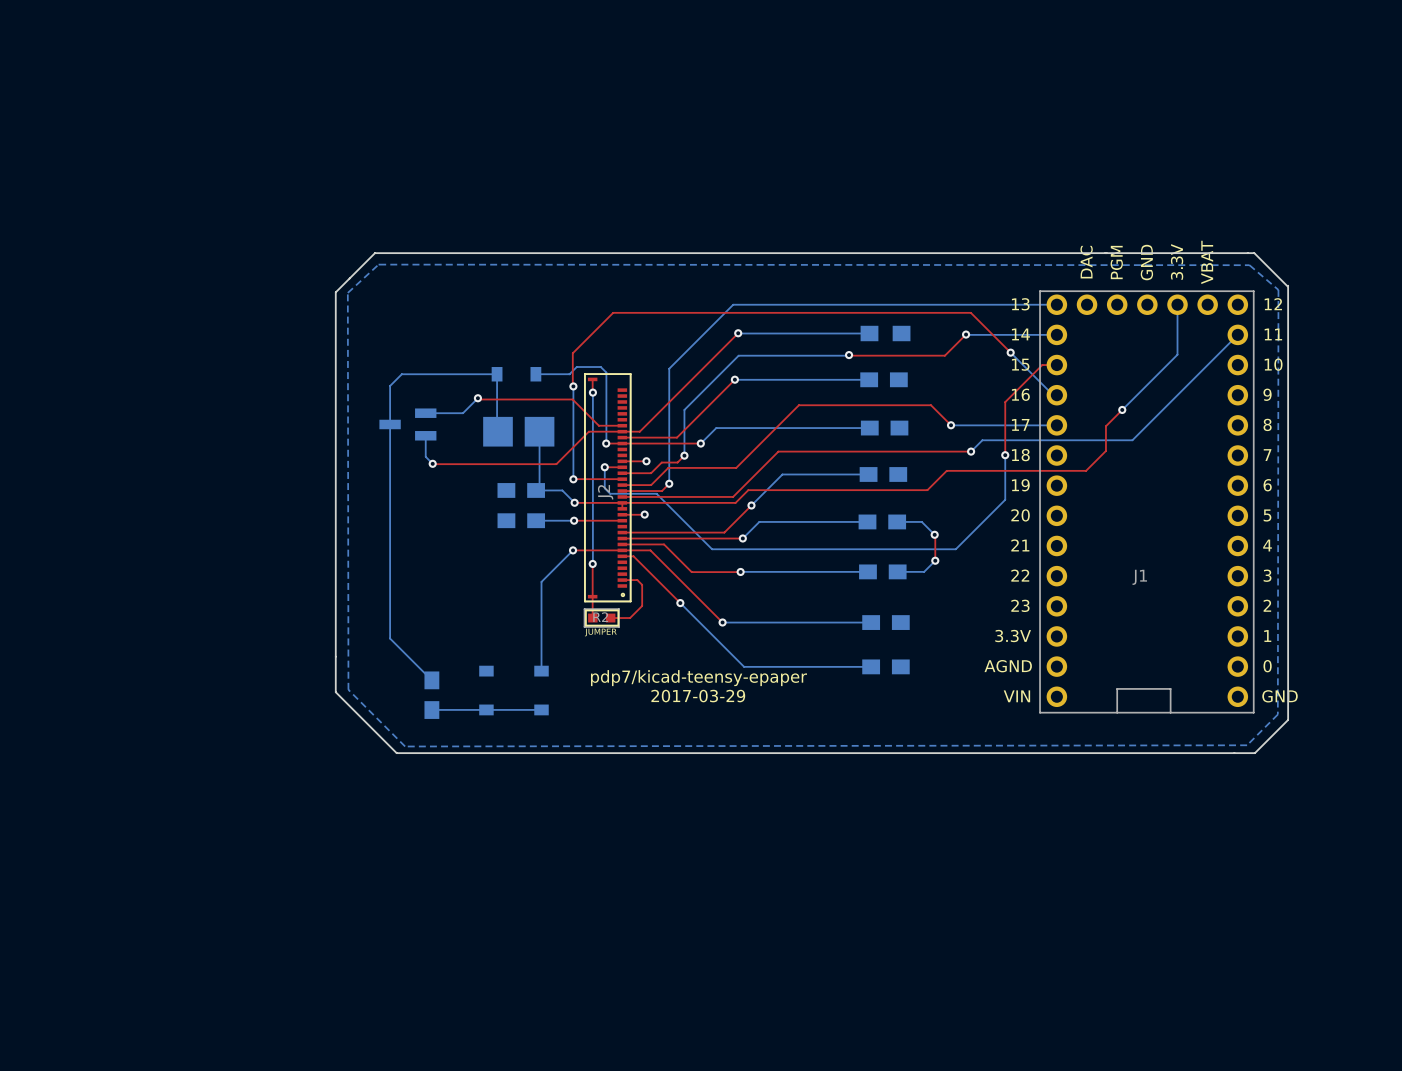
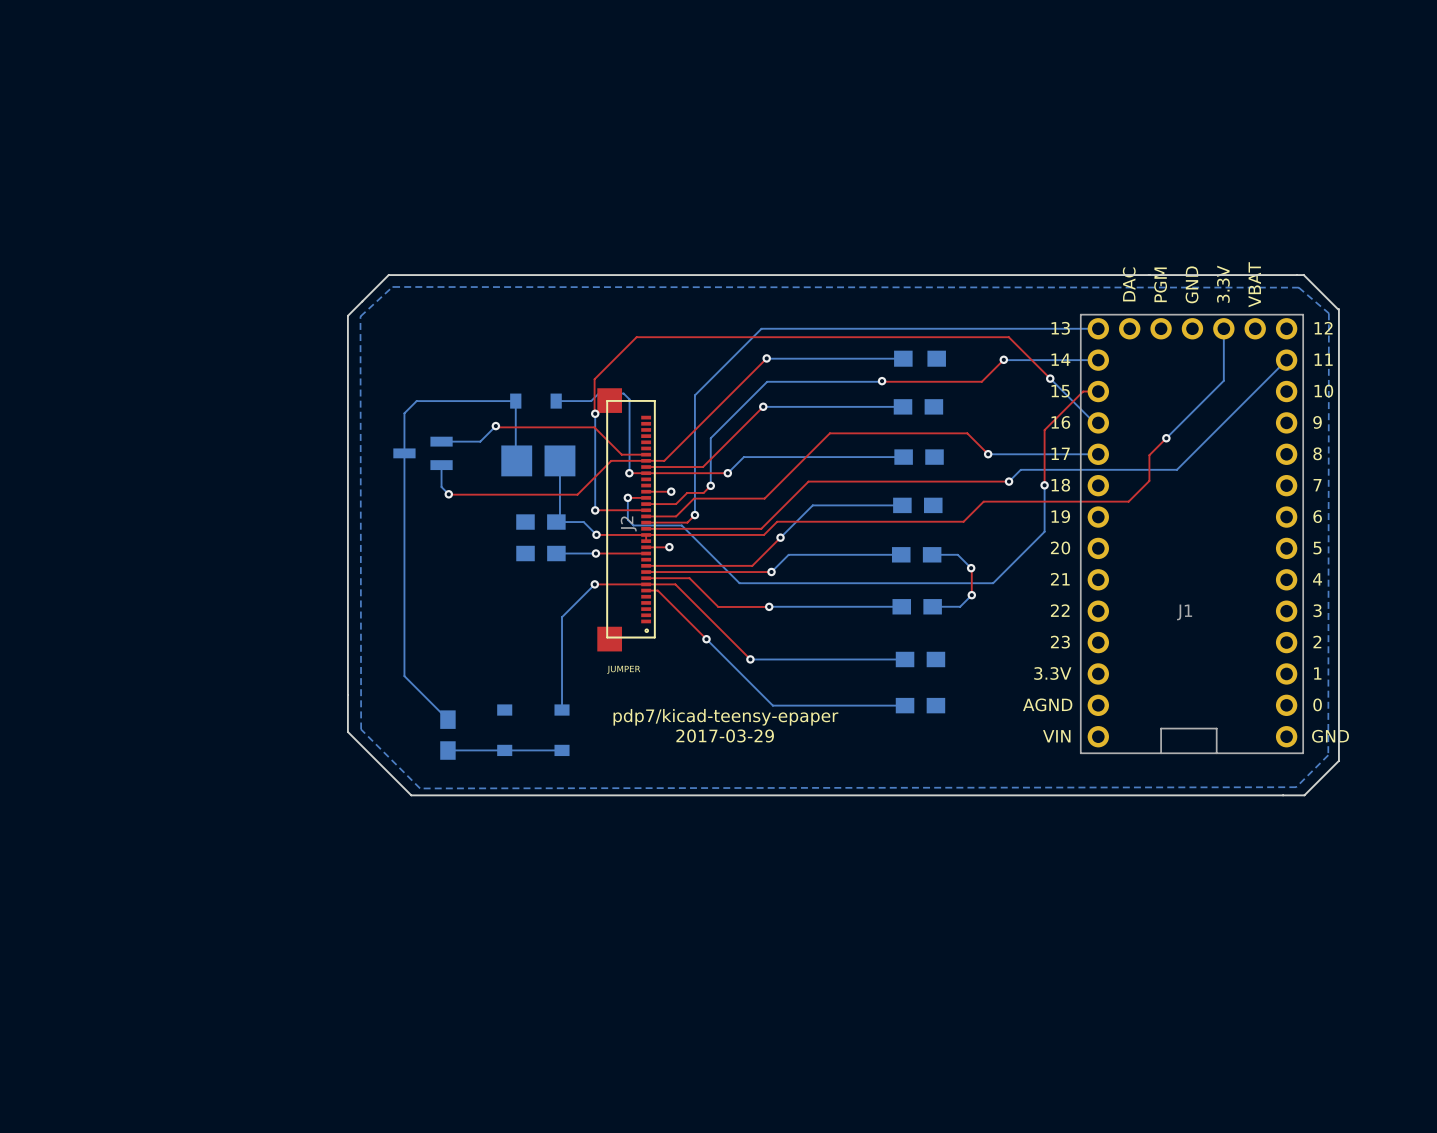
J2 footprint: [584, 373, 631, 602] -> [597, 388, 656, 652]
top track: (592, 379) (592, 392) -> none
bottom track: (592, 392) (592, 563) -> none
via: (592, 392) -> none
via: (592, 563) -> none
top track: (592, 564) (592, 618) -> none
top track: (622, 580) (637, 580) (642, 584) (642, 605) (630, 618) (610, 618) -> none
R2: (601, 618) -> none

